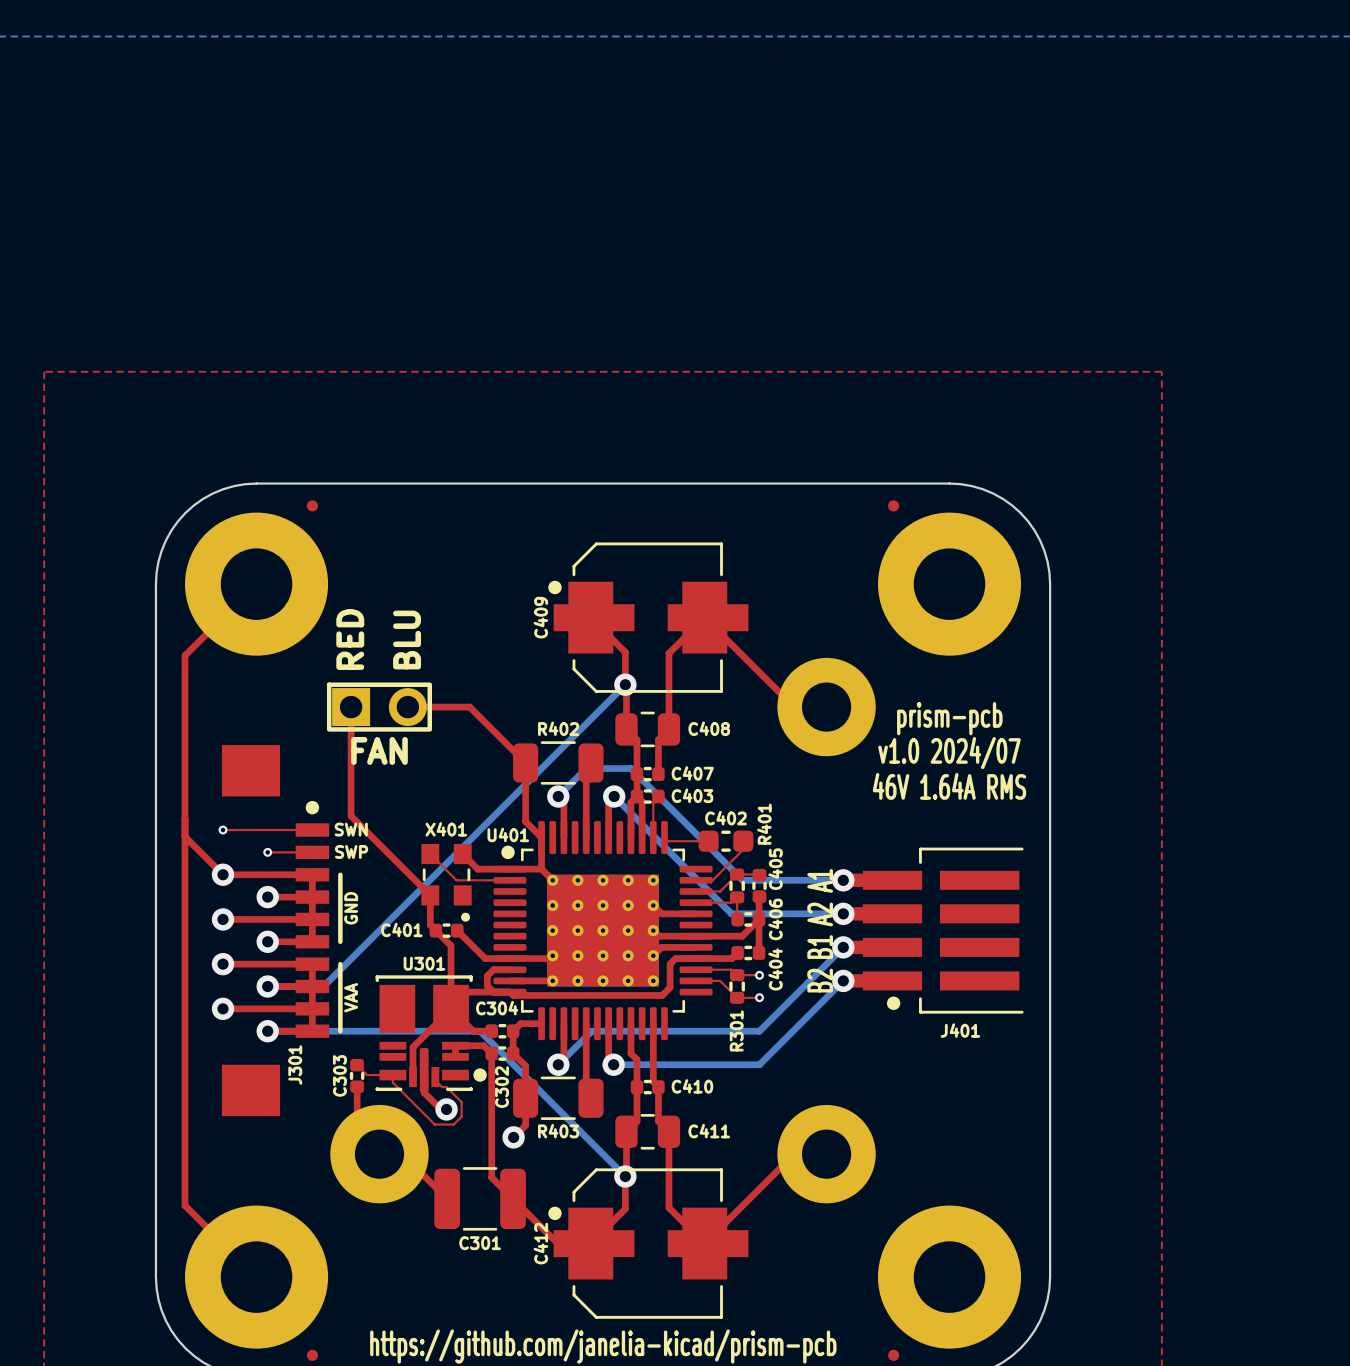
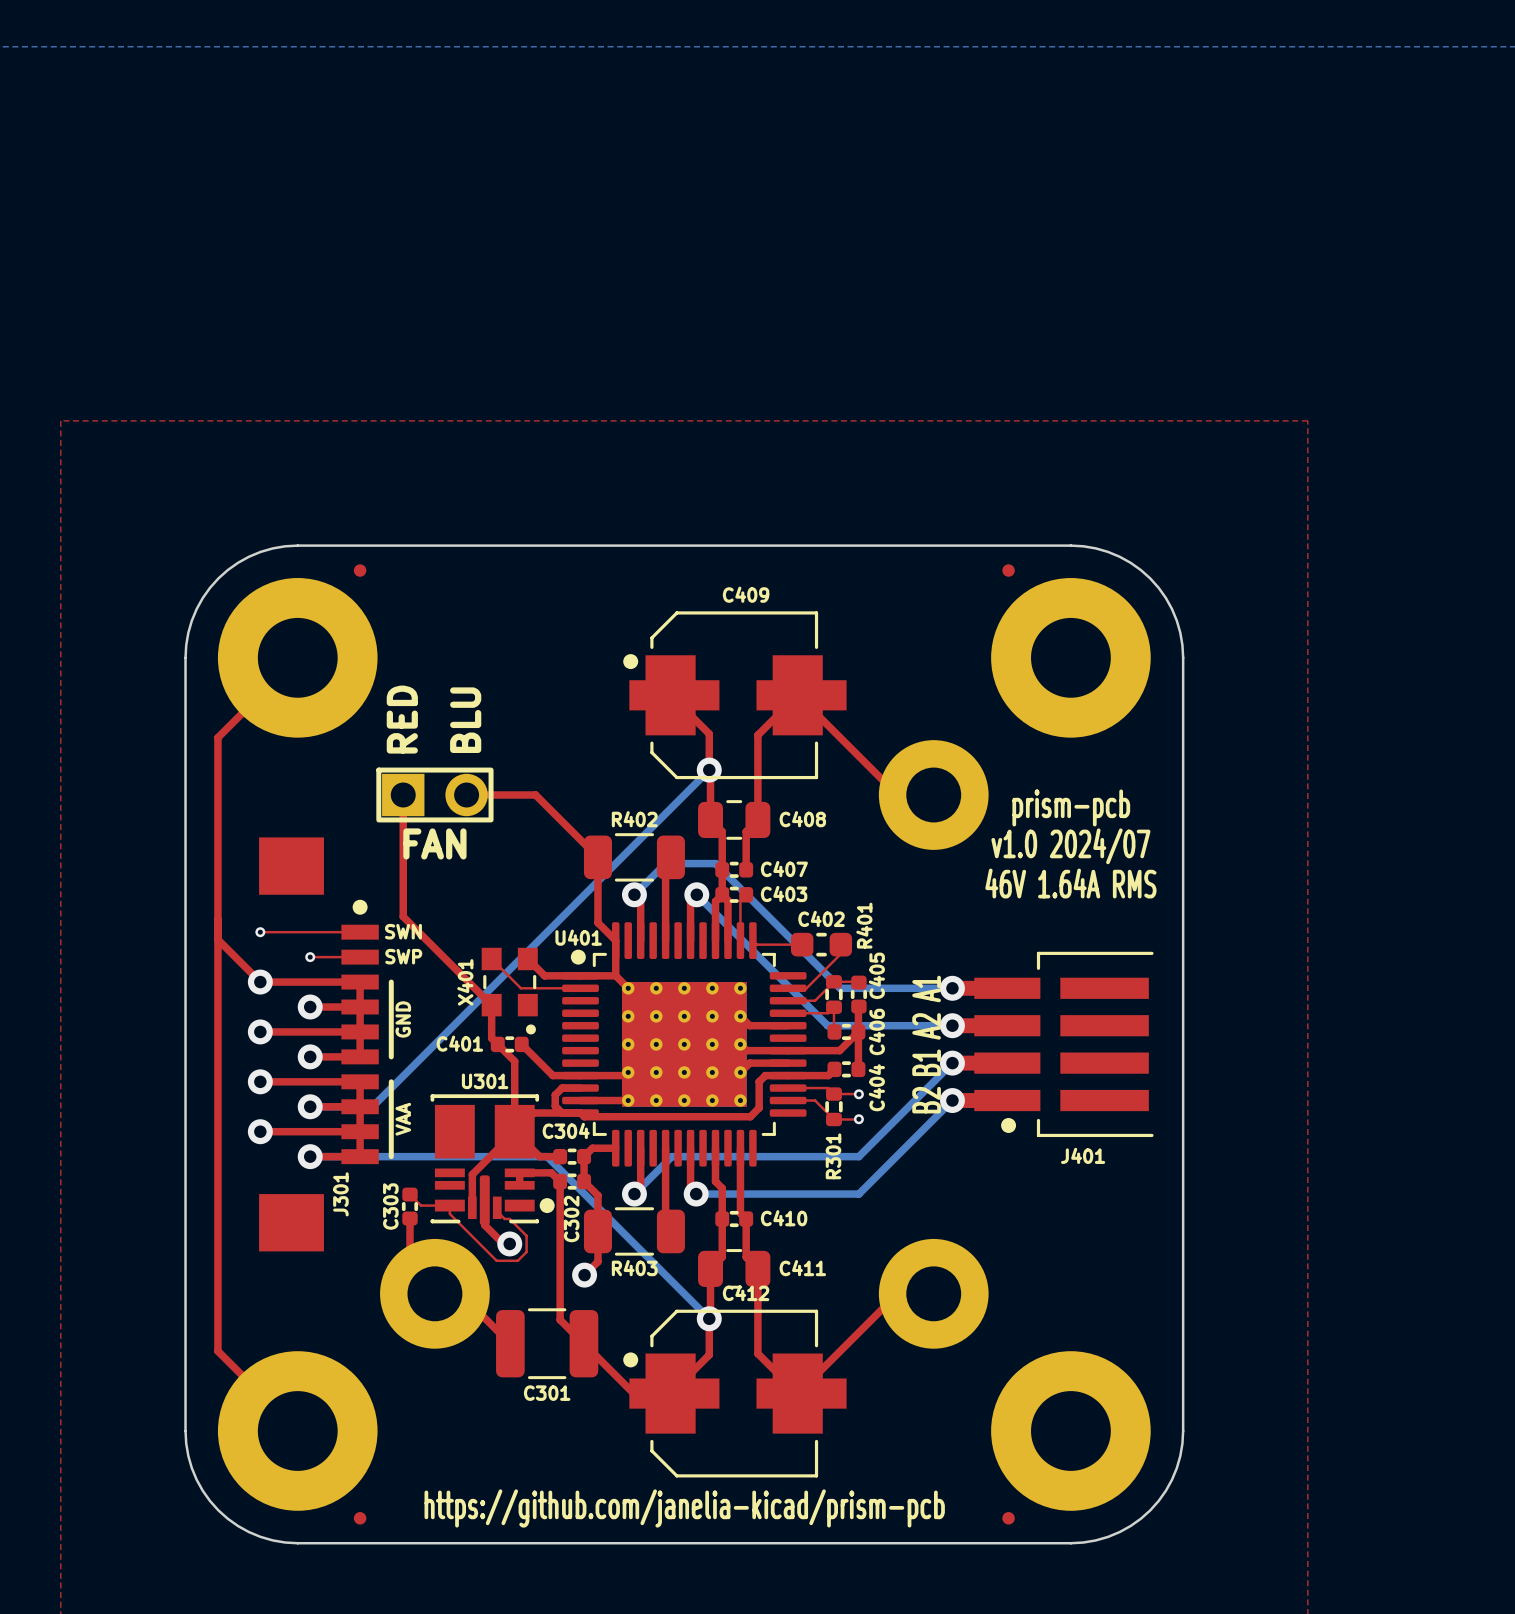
C409 name rotation: 0° (540, 617) -> 90° clockwise (746, 594)
C409 name position: C409 (540, 617) -> C409 (746, 594)
X401 name rotation: 0° (446, 829) -> 90° counterclockwise (465, 982)
X401 name position: X401 (446, 829) -> X401 (465, 982)
C412 name rotation: 0° (540, 1243) -> 90° clockwise (746, 1293)
C412 name position: C412 (540, 1243) -> C412 (746, 1293)

